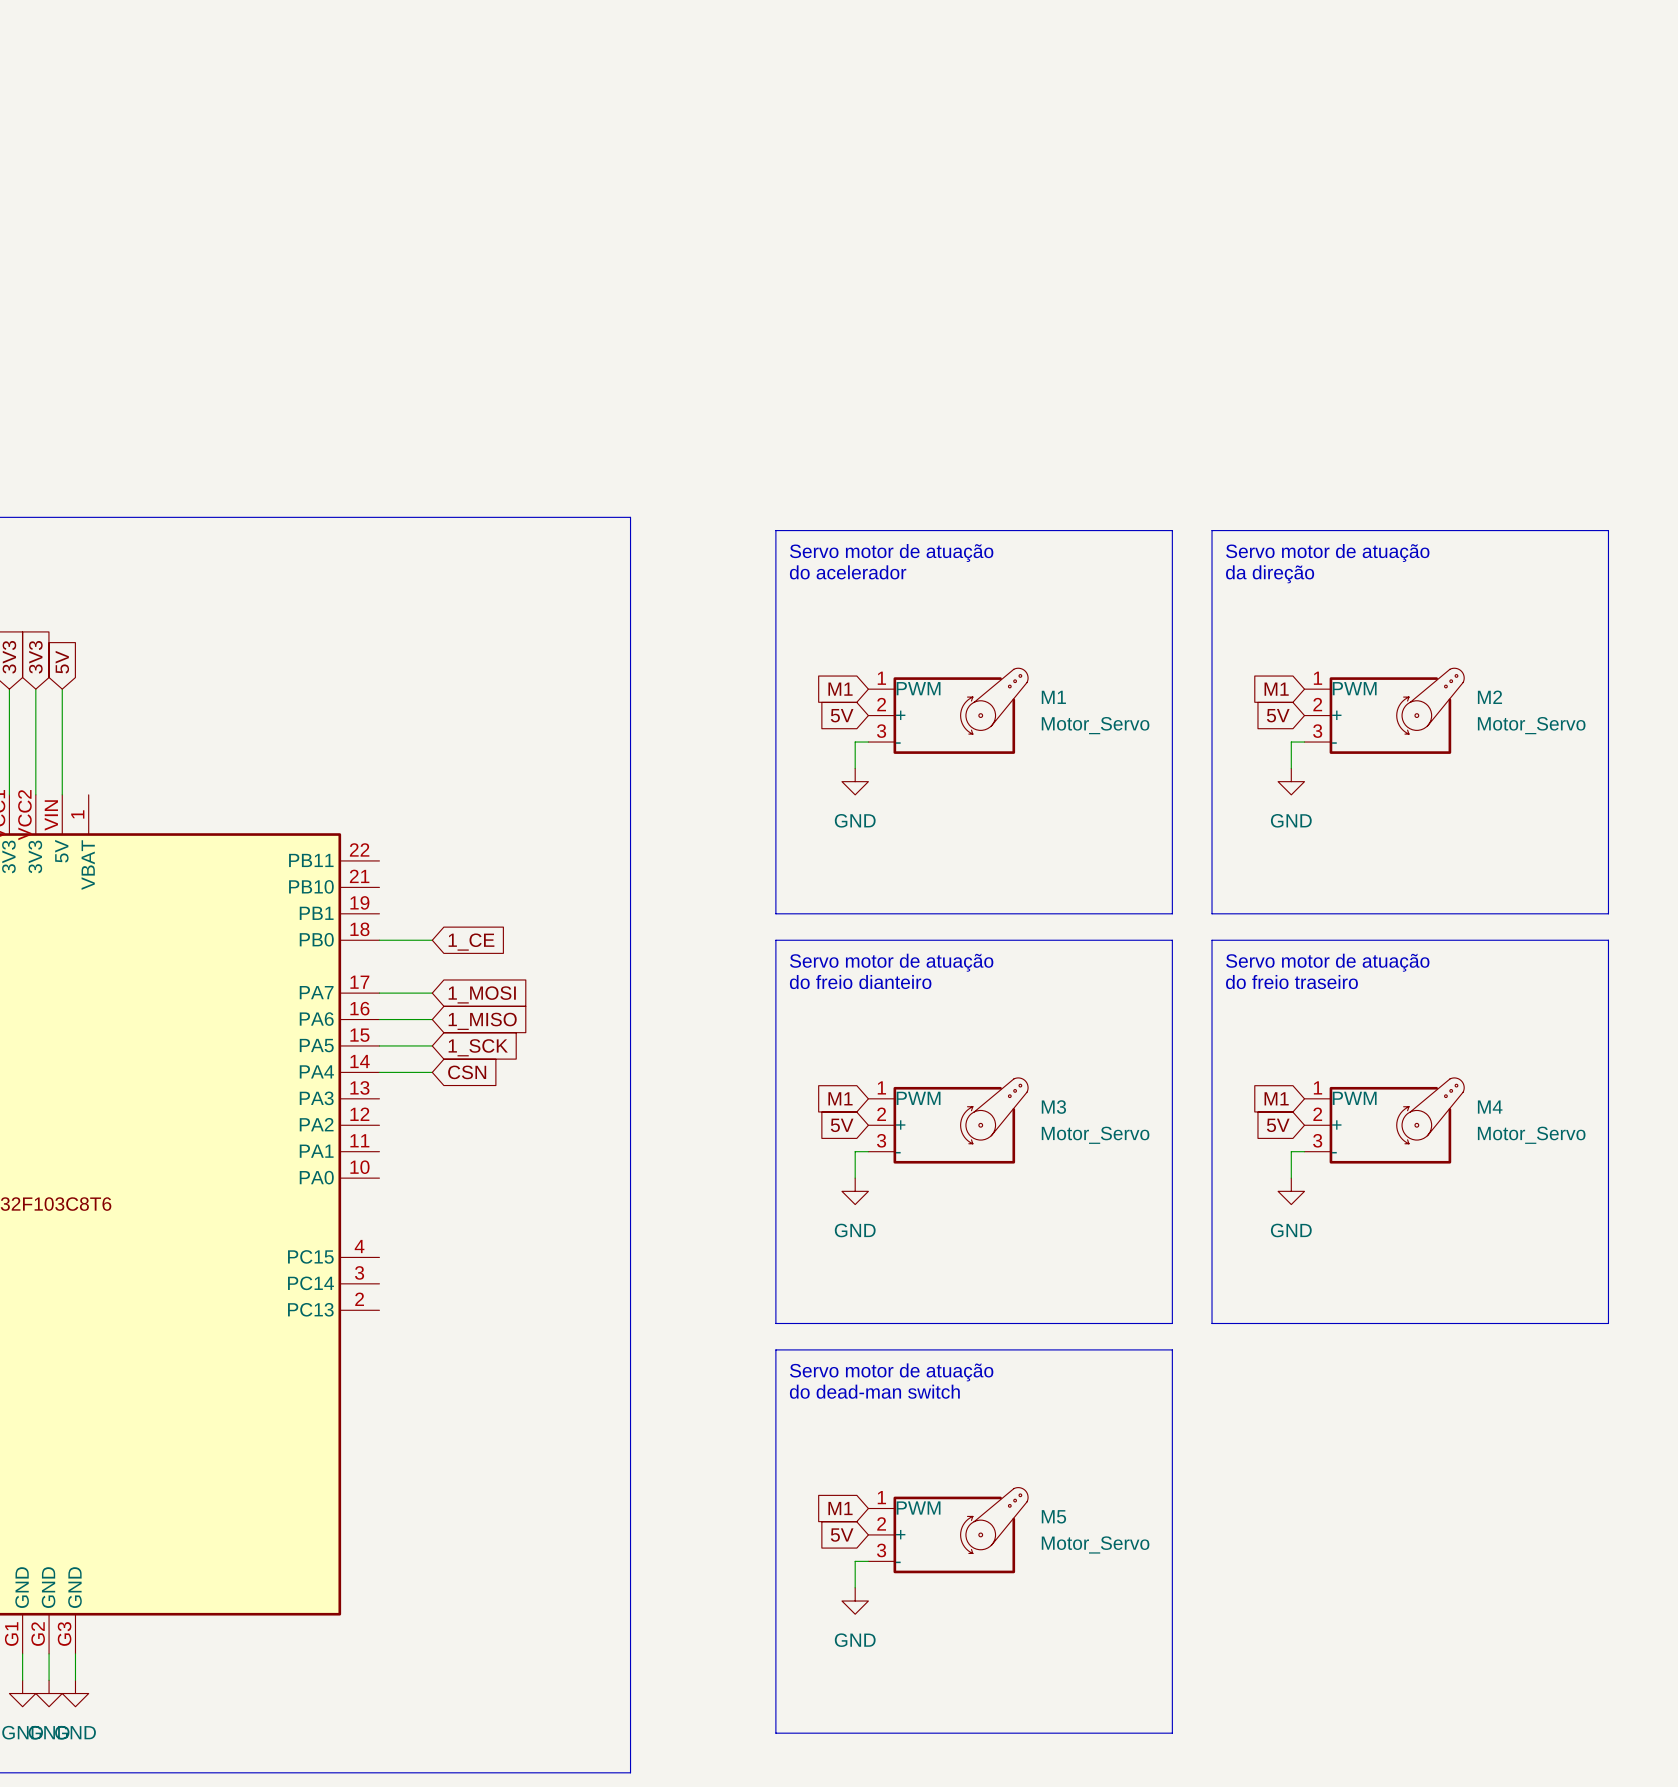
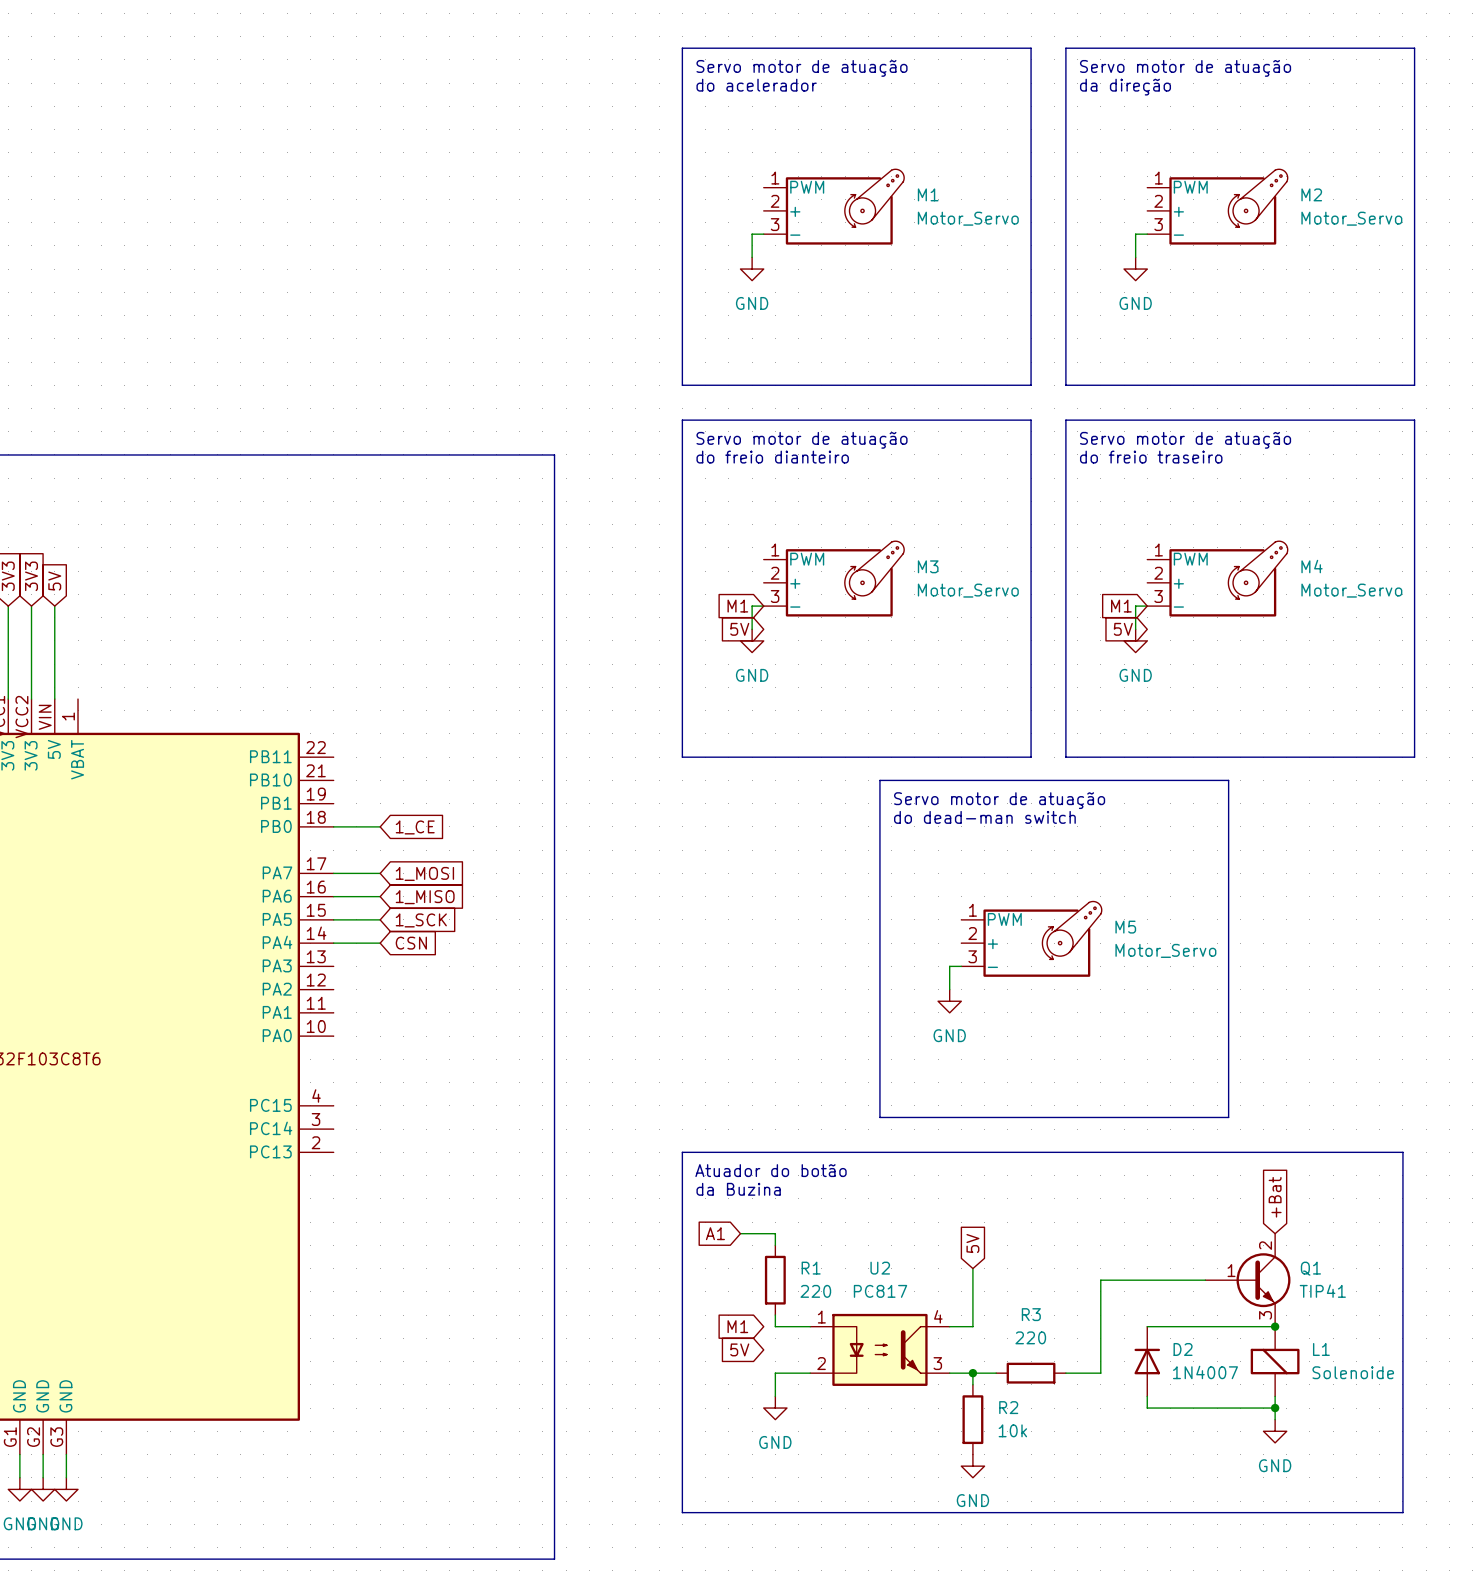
line: none -> (682, 48) (1031, 48) (1031, 385) (682, 385) (682, 48)
line: none -> (1065, 48) (1065, 385) (1414, 385) (1414, 48) (1065, 48)
text: none -> Servo motor de atuação (802, 68)
text: none -> Servo motor de atuação (1185, 68)
text: none -> do acelerador (756, 85)
text: none -> da direção (1125, 87)
wire: none -> (763, 234) (752, 234) (752, 257)
wire: none -> (1147, 234) (1135, 234) (1135, 257)
power symbol: none -> GND (752, 269)
power symbol: none -> GND (1135, 269)
text: none -> do freio dianteiro (772, 457)
text: none -> do freio traseiro (1151, 457)
line: (775, 530) (1172, 530) -> (682, 466) (682, 420) (1031, 420) (1031, 466)
line: (1212, 530) (1608, 530) -> (1065, 466) (1065, 420) (1414, 420) (1414, 466)
text position: Servo motor de atuação (891, 553) -> Servo motor de atuação (802, 440)
text position: Servo motor de atuação (1327, 553) -> Servo motor de atuação (1185, 440)
text: do acelerador (848, 572) -> none
text: da direção (1270, 574) -> none
M1 position: (948, 711) -> (833, 206)
M2 position: (1384, 711) -> (1217, 206)
wire: (868, 742) (855, 742) (855, 768) -> (763, 606) (752, 606) (752, 629)
wire: (1304, 742) (1291, 742) (1291, 768) -> (1147, 606) (1135, 606) (1135, 629)
power symbol position: GND (855, 781) -> GND (752, 640)
power symbol position: GND (1291, 781) -> GND (1135, 640)
line: (775, 860) (775, 913) (1172, 913) (1172, 860) -> (682, 757) (1031, 757)
line: (1212, 860) (1212, 913) (1608, 913) (1608, 860) -> (1065, 757) (1414, 757)
text: none -> Servo motor de atuação (999, 800)
text: none -> do dead-man switch (984, 817)
line: (1212, 940) (1212, 1323) (1608, 1323) (1608, 940) (1212, 940) -> (879, 780) (879, 1117) (1228, 1117) (1228, 780) (879, 780)
text: Servo motor de atuação (891, 962) -> none
text: Servo motor de atuação (1327, 962) -> none
text: do freio dianteiro (860, 982) -> none
text: do freio traseiro (1291, 982) -> none
global label: M1 (840, 1098) -> none
global label: M1 (1276, 1098) -> none
M3 position: (948, 1120) -> (833, 578)
M4 position: (1384, 1120) -> (1217, 578)
global label: 5V (842, 1125) -> none
global label: 5V (1278, 1125) -> none
power symbol: none -> GND (949, 1001)
wire: (868, 1151) (855, 1151) (855, 1178) -> none
wire: (1304, 1151) (1291, 1151) (1291, 1178) -> (961, 966) (949, 966) (949, 989)
power symbol: GND (855, 1191) -> none
power symbol: GND (1291, 1191) -> none
line: (775, 1310) (775, 940) (1172, 940) (1172, 1323) (775, 1323) -> (682, 1187) (682, 1163)
text: none -> Atuador do botão (771, 1170)
line: (775, 1349) (1172, 1349) (1172, 1733) (775, 1733) (775, 1719) -> (682, 1152) (1402, 1152) (1402, 1512) (682, 1512)
text: none -> da Buzina (738, 1189)
global label: none -> +Bat (1275, 1197)
text: Servo motor de atuação (891, 1372) -> none
text: do dead-man switch (874, 1391) -> none
global label: none -> A1 (715, 1233)
wire: none -> (740, 1233) (775, 1233) (775, 1245)
global label: none -> 5V (972, 1243)
wire: none -> (972, 1268) (972, 1326) (949, 1326)
R1: none -> 220 (775, 1280)
wire: none -> (1205, 1280) (1100, 1280) (1100, 1373) (1065, 1373)
Q1: none -> TIP41 (1247, 1280)
wire: none -> (1147, 1326) (1275, 1326)
junction: none -> (1275, 1326)
M5 position: (948, 1530) -> (1031, 939)
U2: none -> PC817 (879, 1349)
D2: none -> 1N4007 (1147, 1361)
L1: none -> Solenoide (1275, 1361)
wire: (868, 1561) (855, 1561) (855, 1587) -> none
wire: none -> (810, 1373) (775, 1373) (775, 1396)
wire: none -> (949, 1373) (996, 1373)
wire: none -> (972, 1373) (972, 1384)
junction: none -> (972, 1373)
R3: none -> 220 (1031, 1373)
wire: none -> (1147, 1396) (1147, 1408) (1275, 1408)
wire: none -> (1275, 1396) (1275, 1419)
power symbol position: GND (855, 1601) -> GND (775, 1408)
junction: none -> (1275, 1408)
R2: none -> 10k (972, 1419)
power symbol: none -> GND (1275, 1431)
power symbol: none -> GND (972, 1466)

